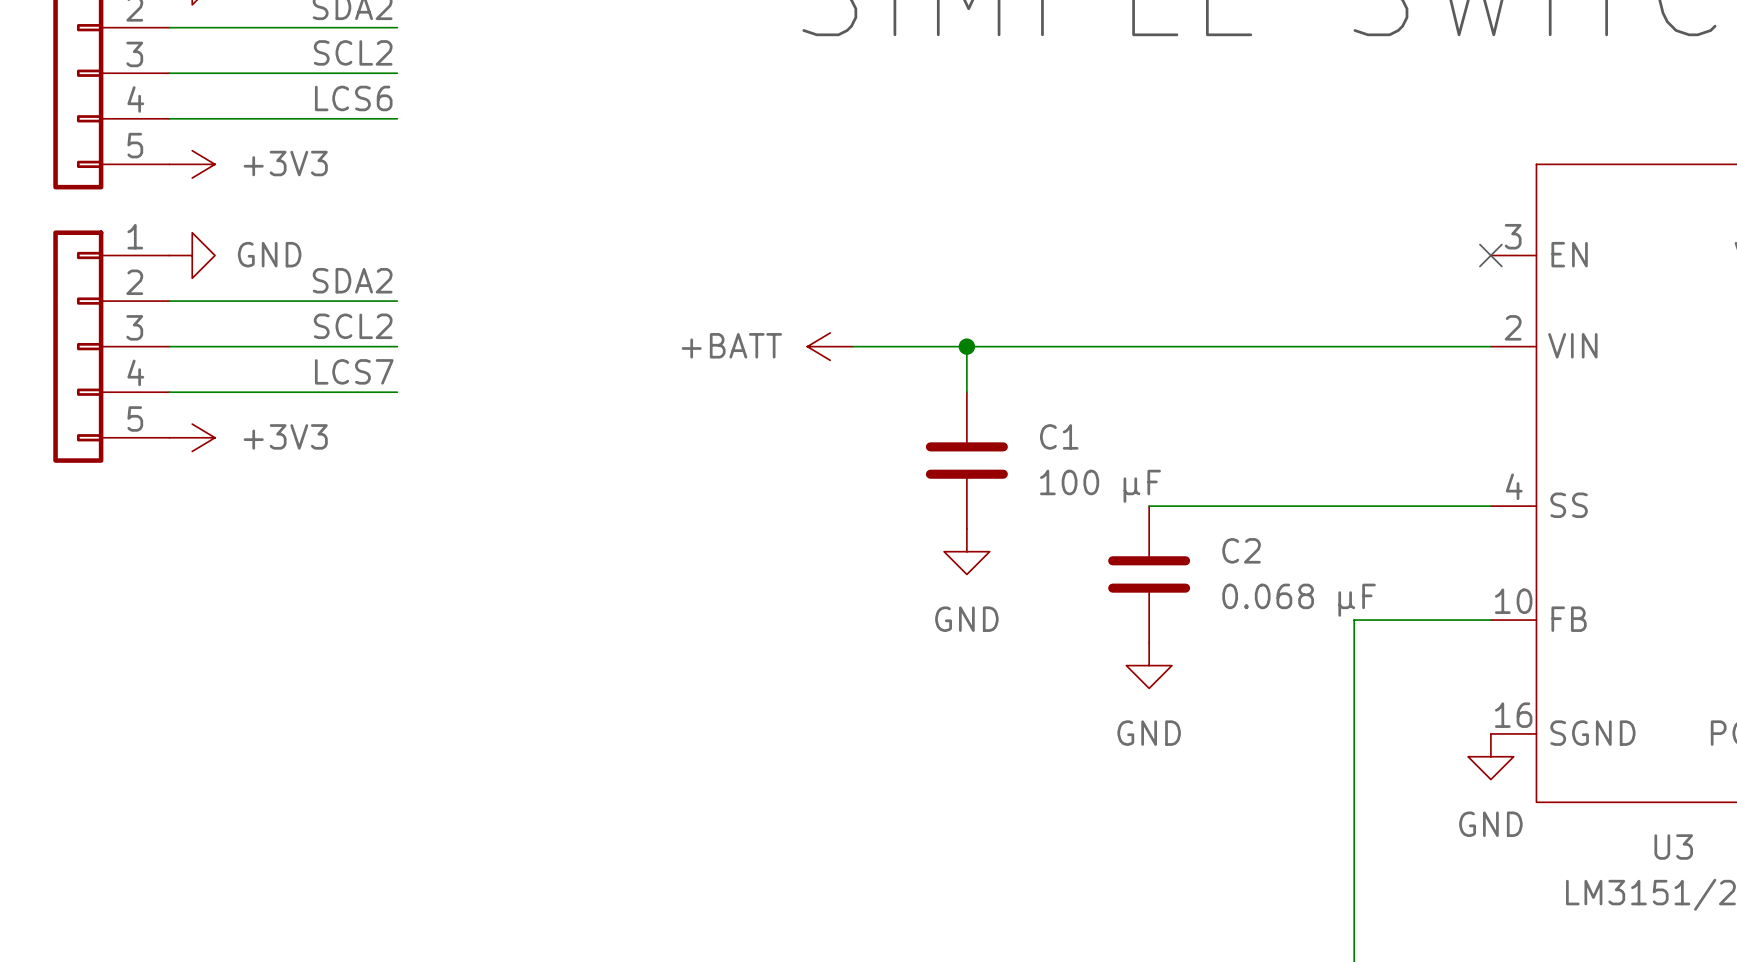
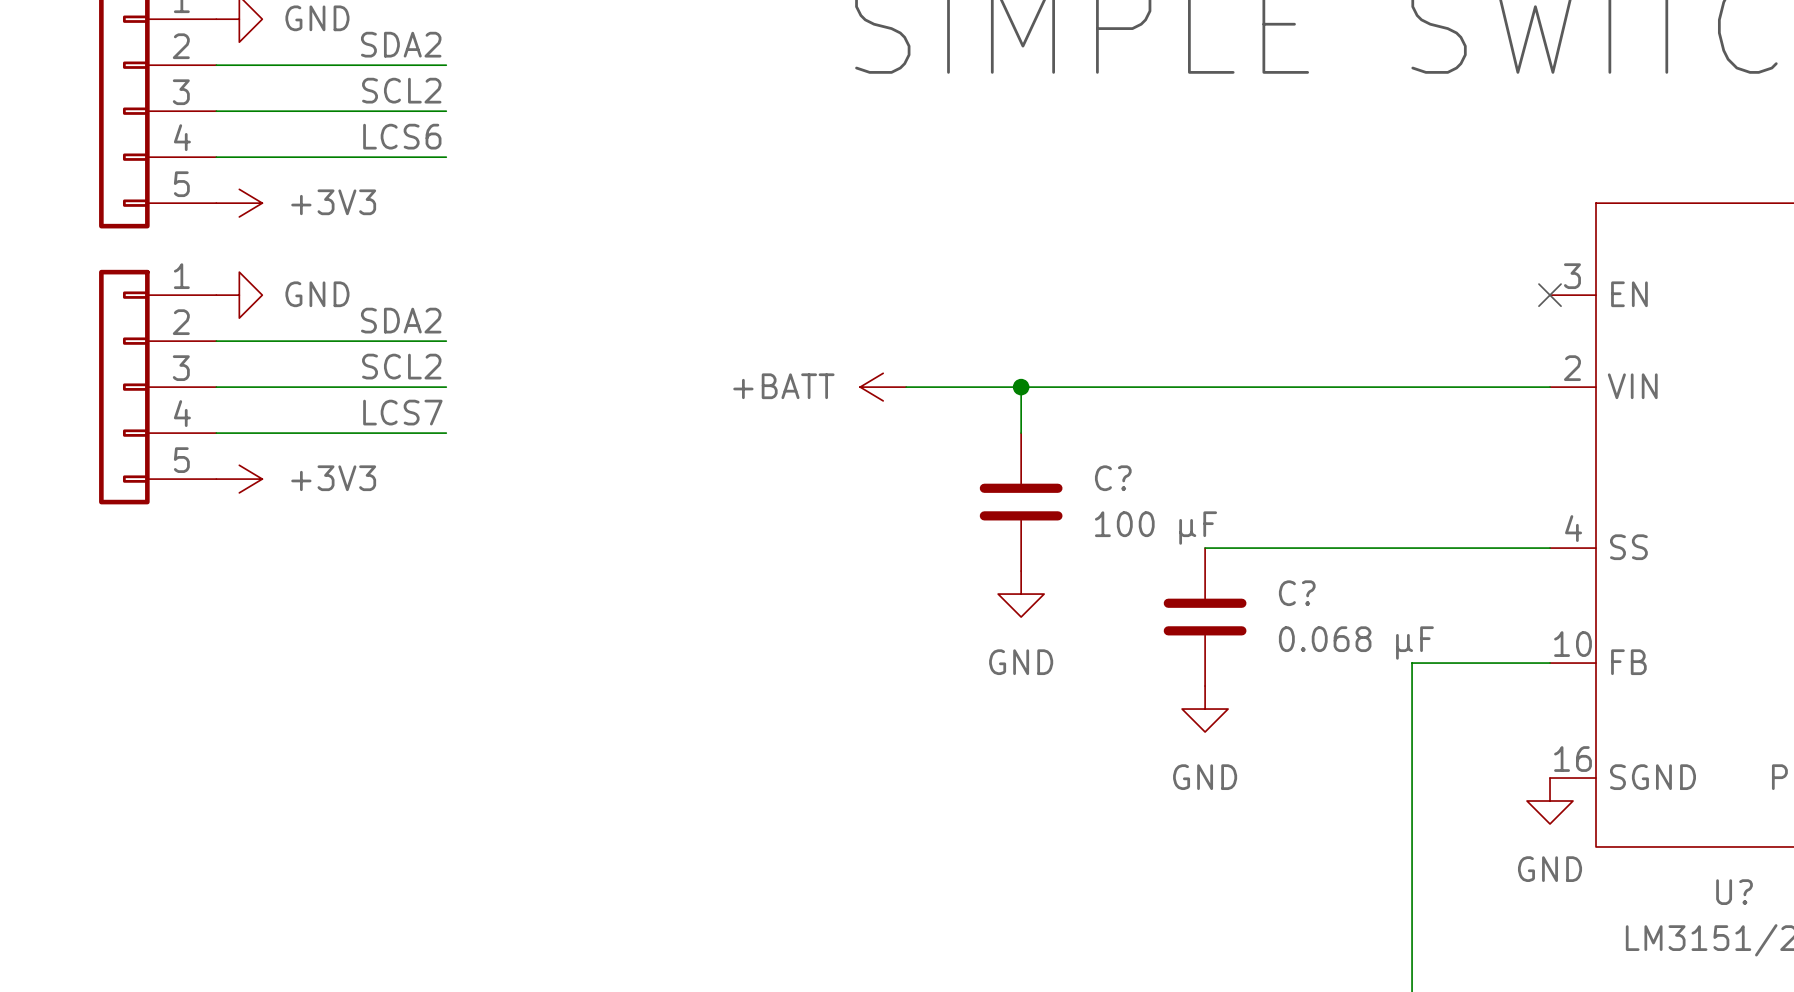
C1 name: C1 (1059, 436) -> C? (1113, 478)
C2 name: C2 (1241, 550) -> C? (1297, 593)
U3 name: U3 (1673, 847) -> U? (1734, 892)

